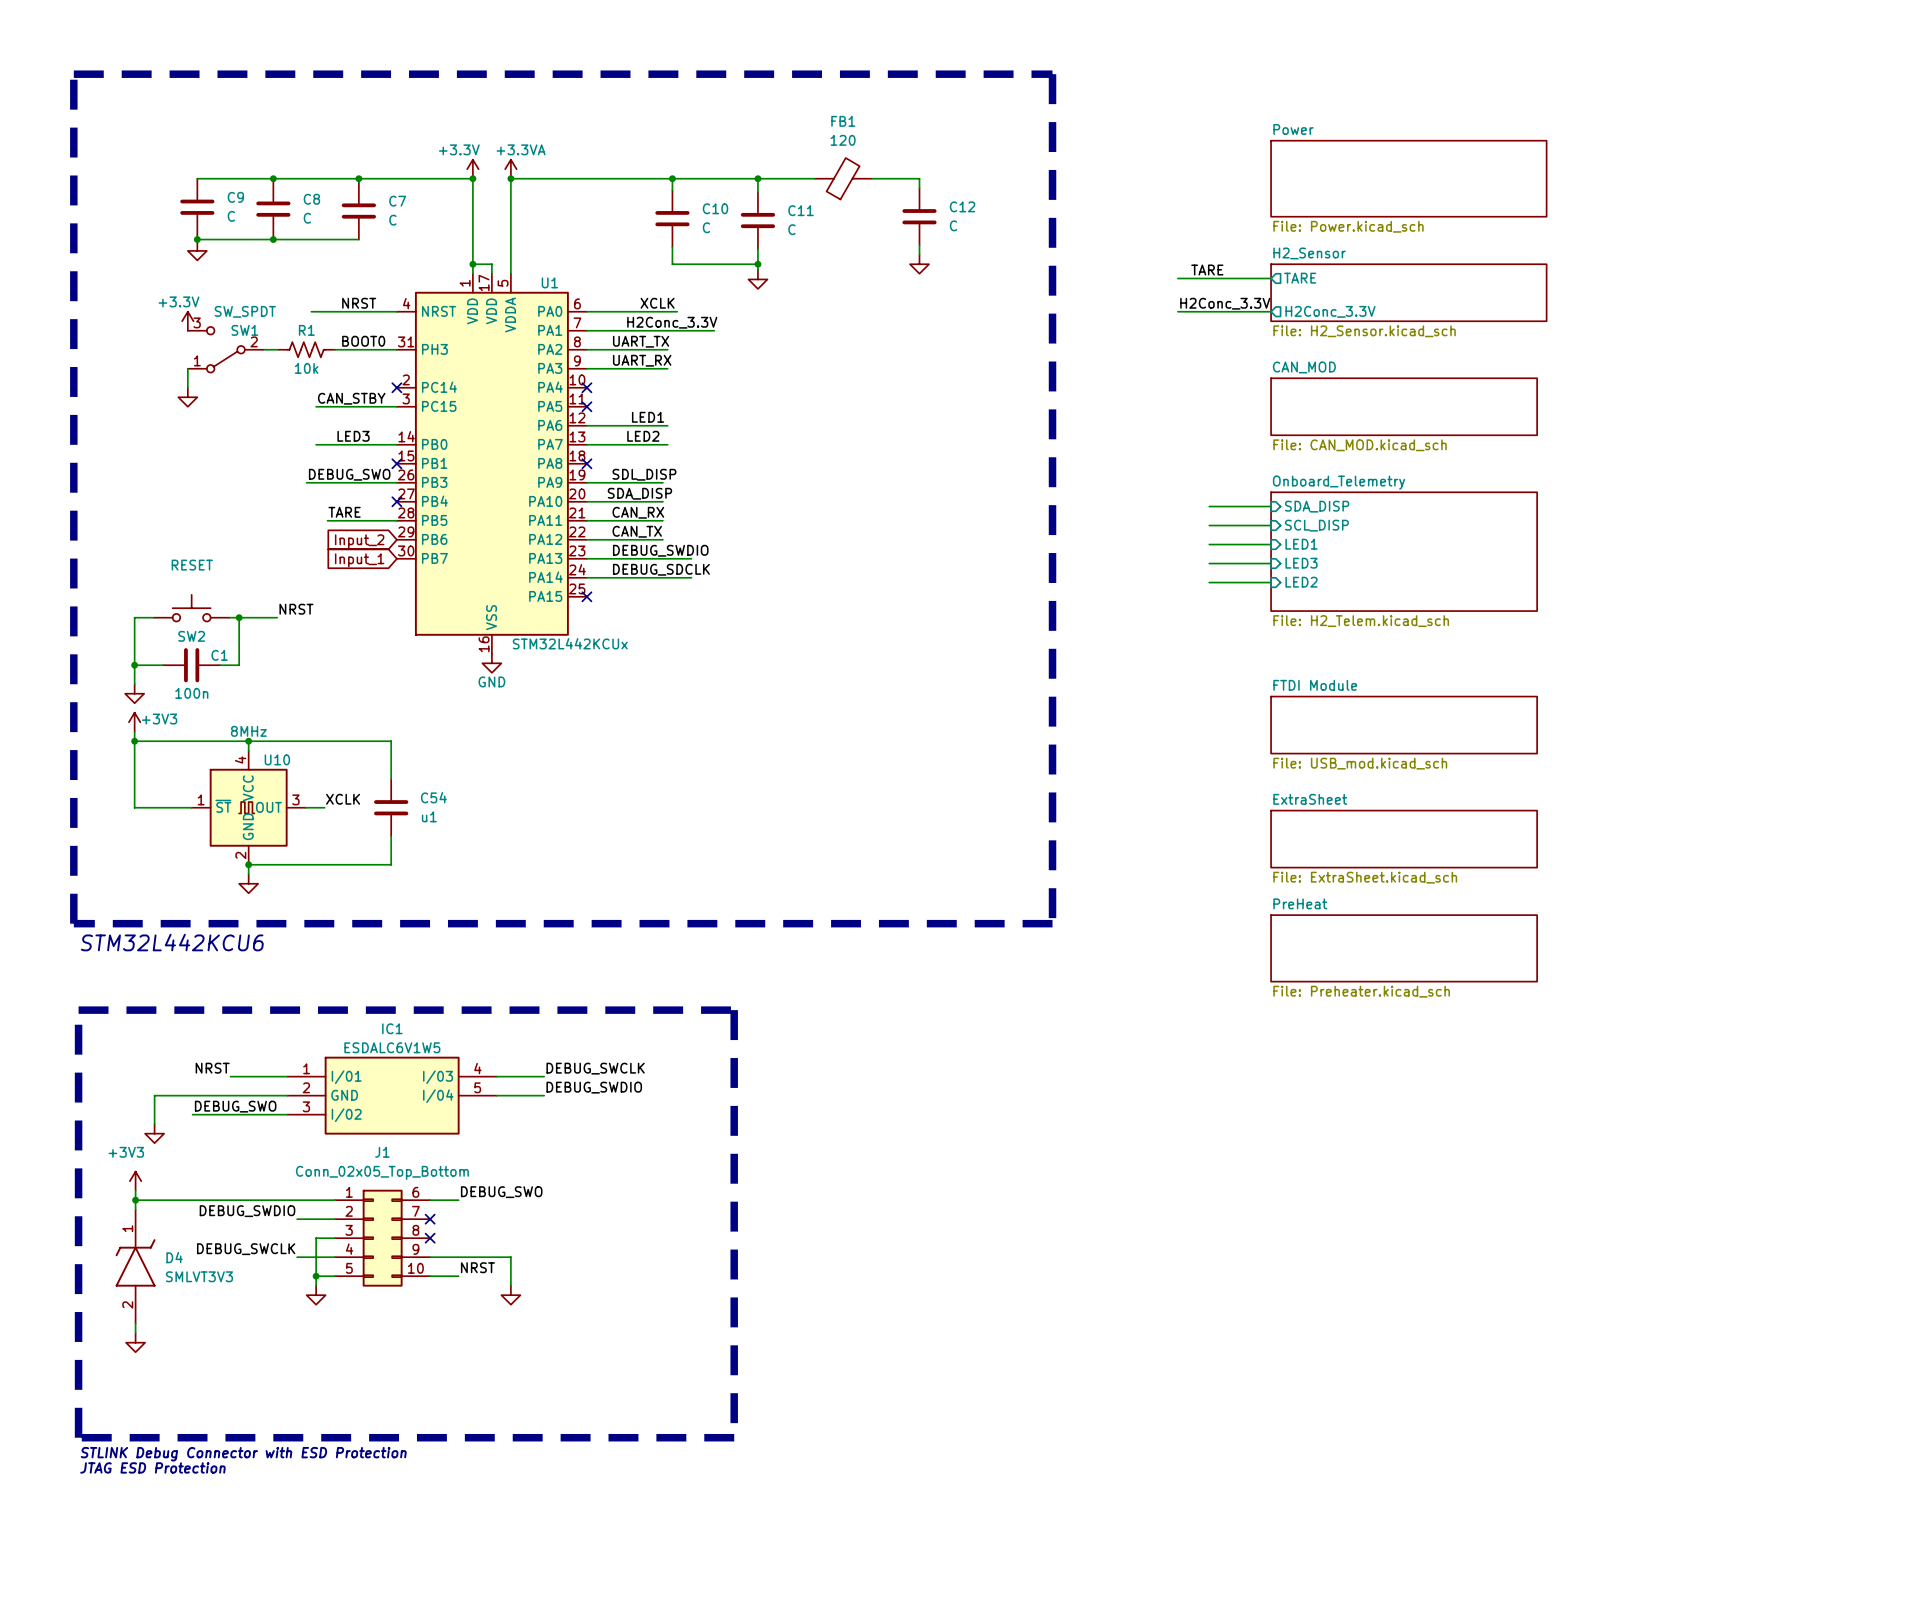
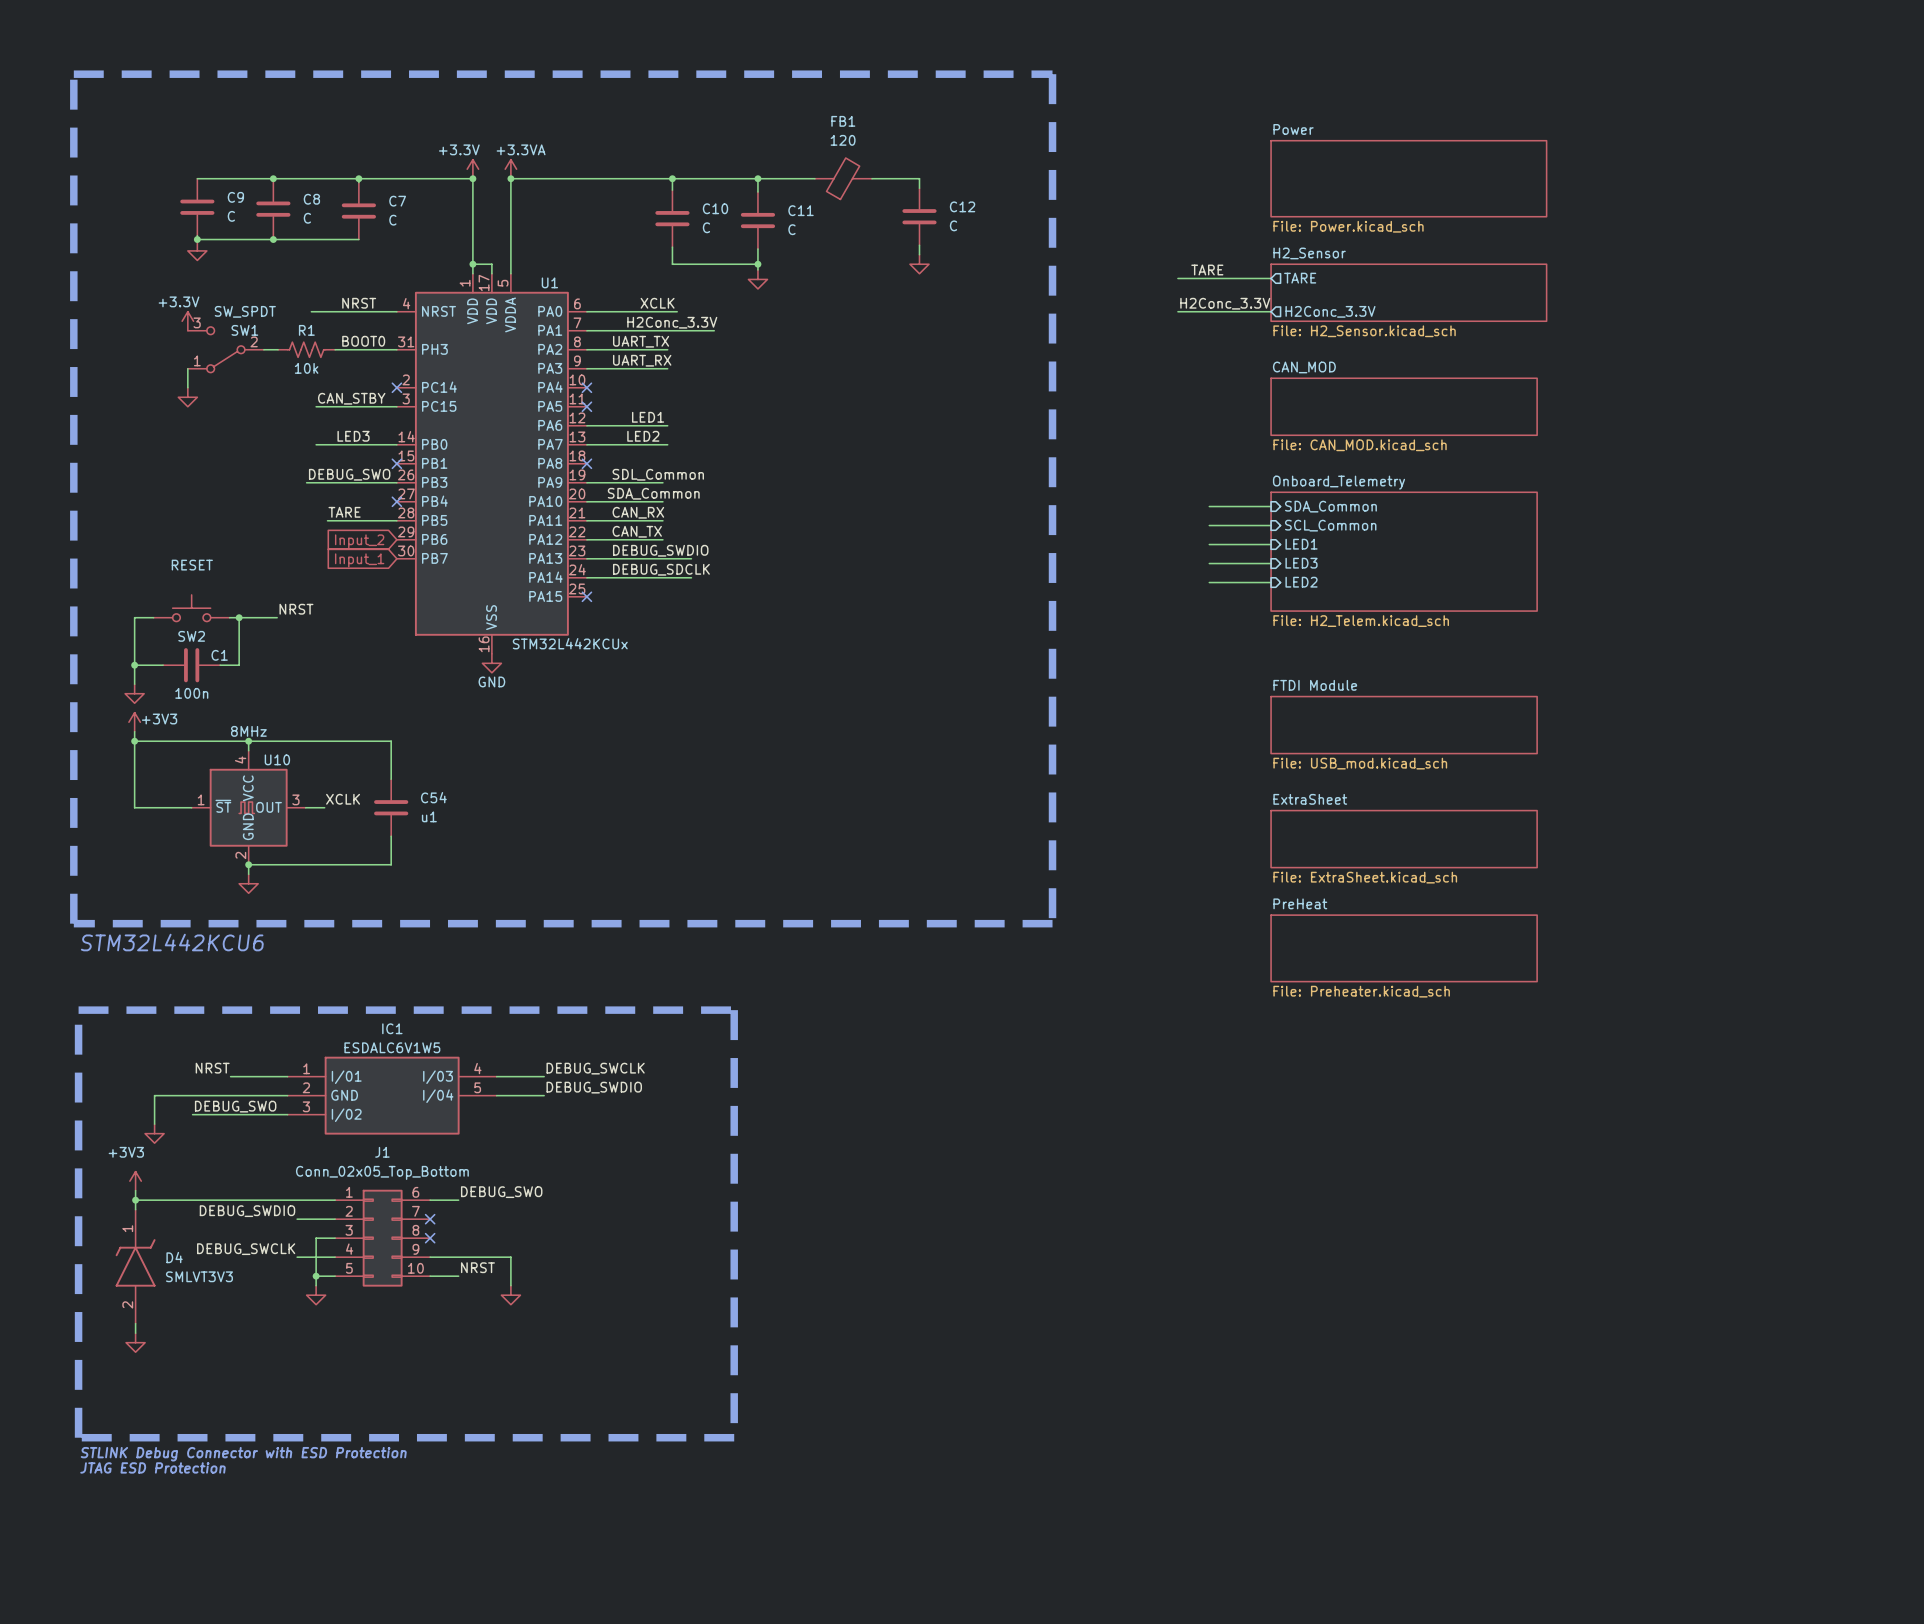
label: SDL_DISP (644, 474) -> SDL_Common (658, 474)
label: SDA_DISP (639, 493) -> SDA_Common (653, 493)
sheet pin: SDA_DISP (1317, 506) -> SDA_Common (1330, 506)
sheet pin: SCL_DISP (1316, 525) -> SCL_Common (1330, 525)

